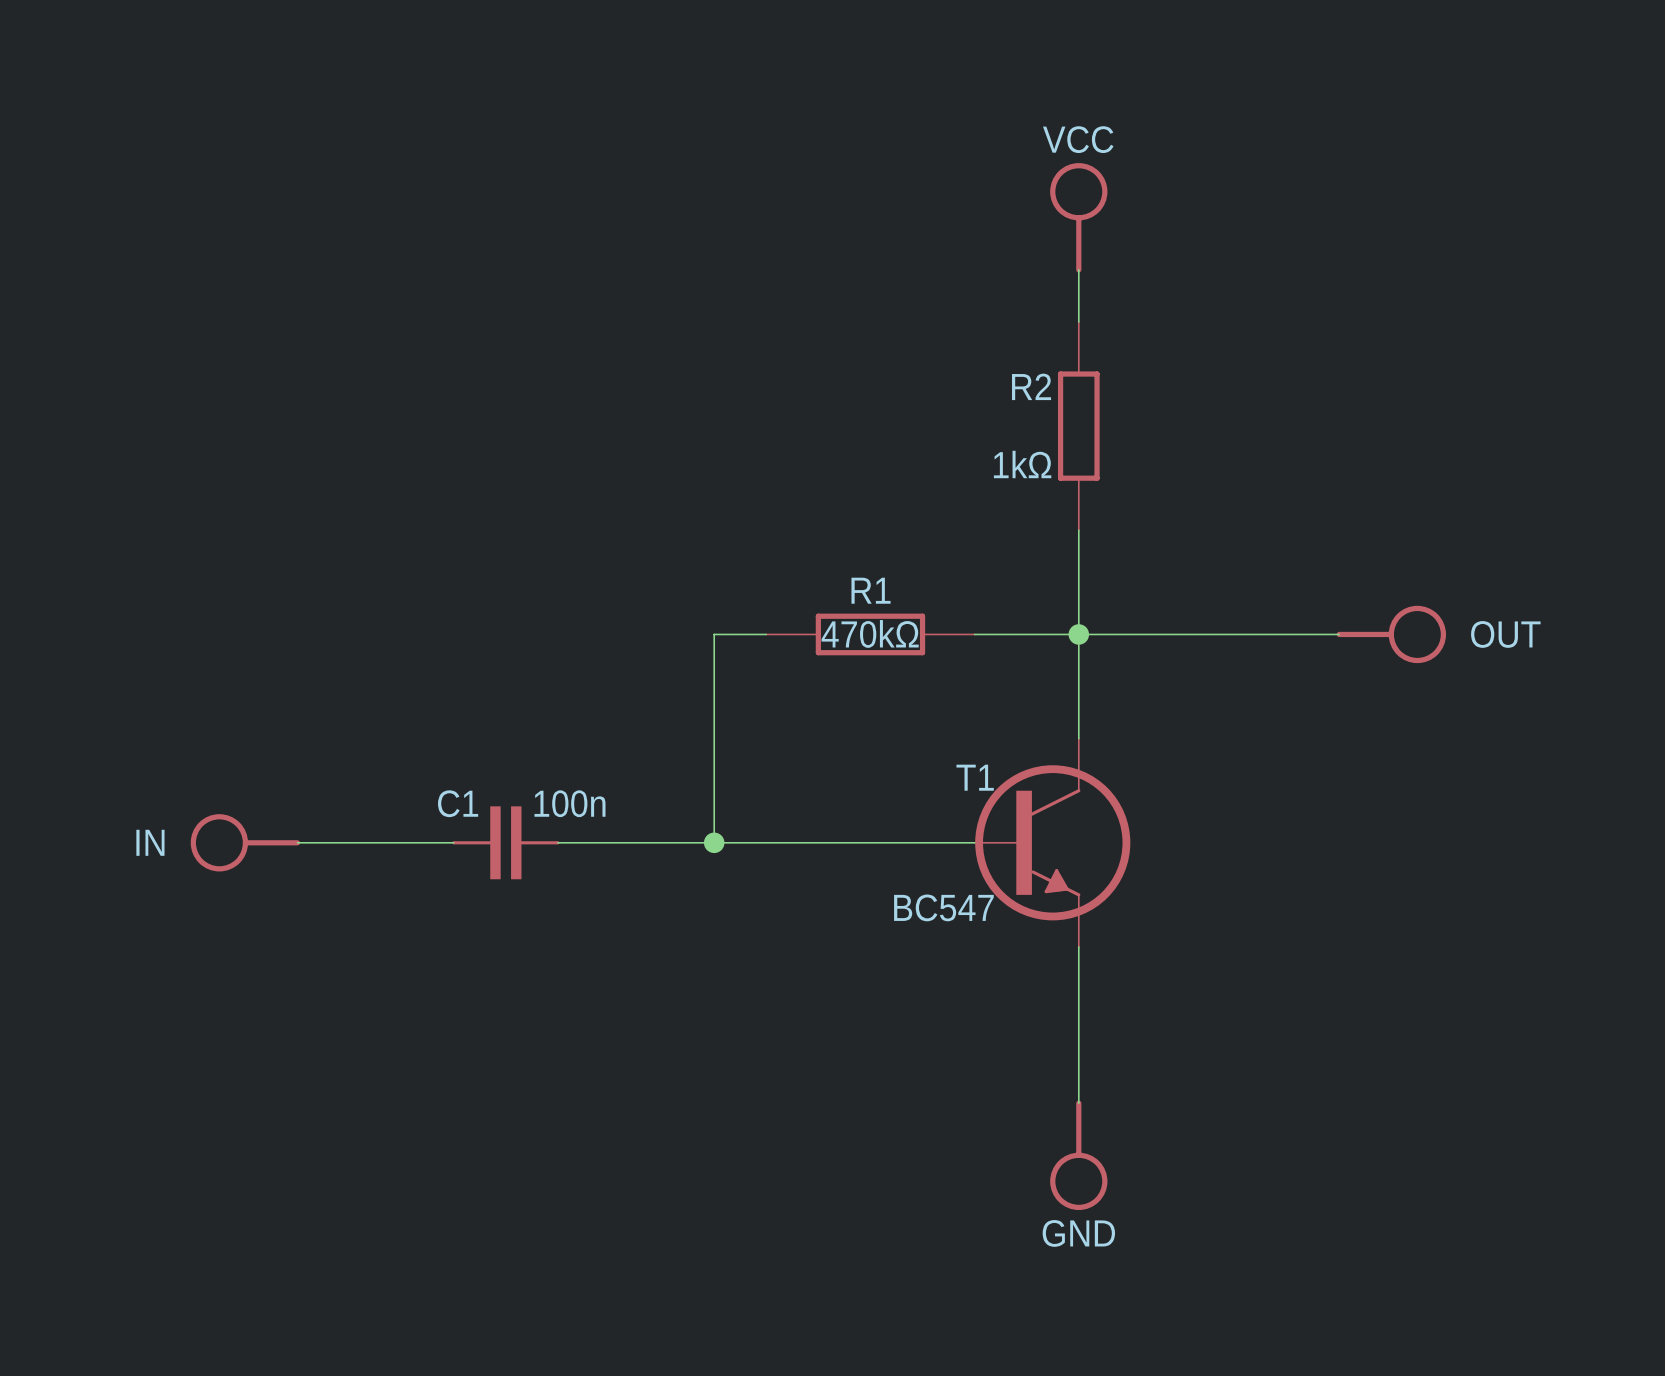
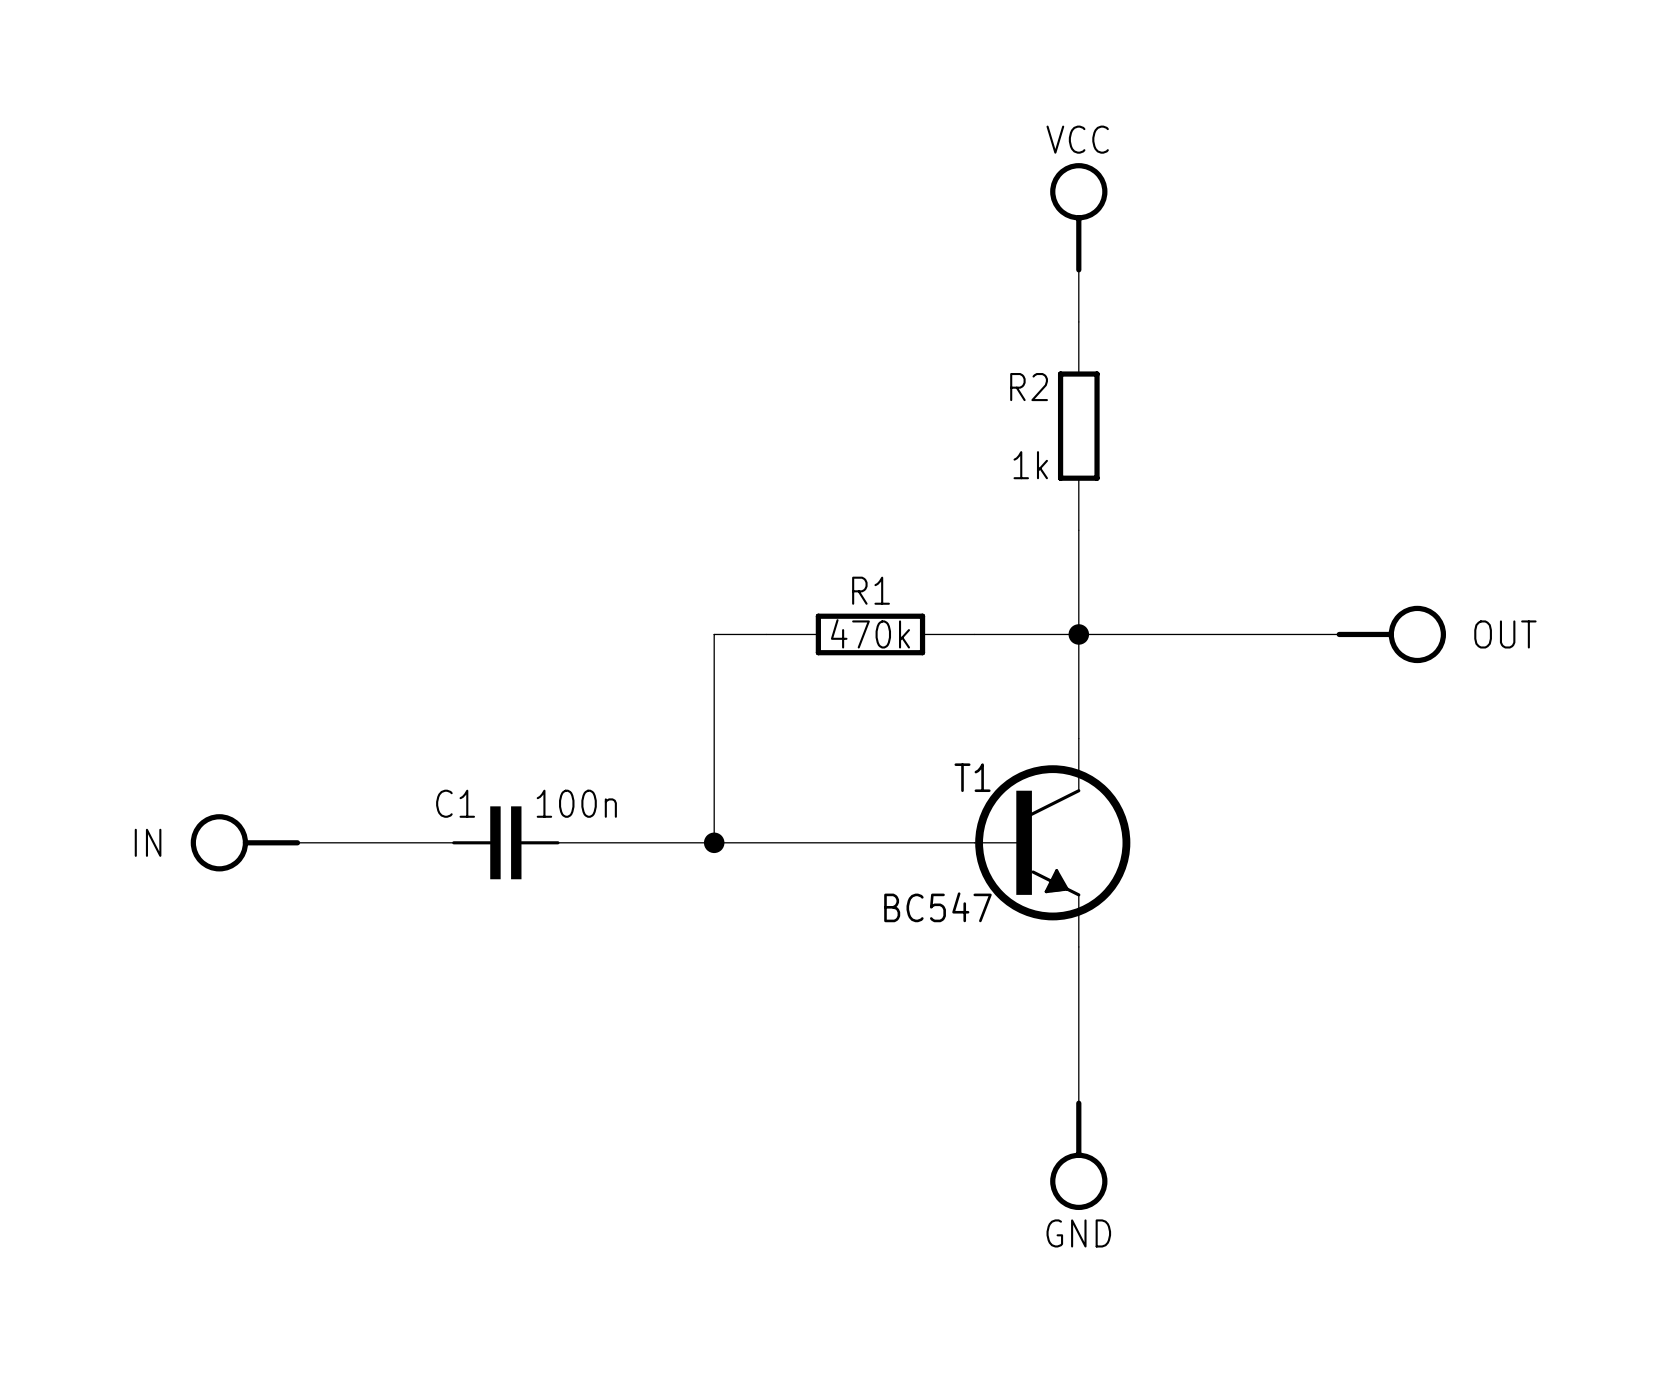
R2 value: 1kΩ (1022, 464) -> 1k (1030, 465)
R1 value: 470kΩ (870, 633) -> 470k (870, 633)

